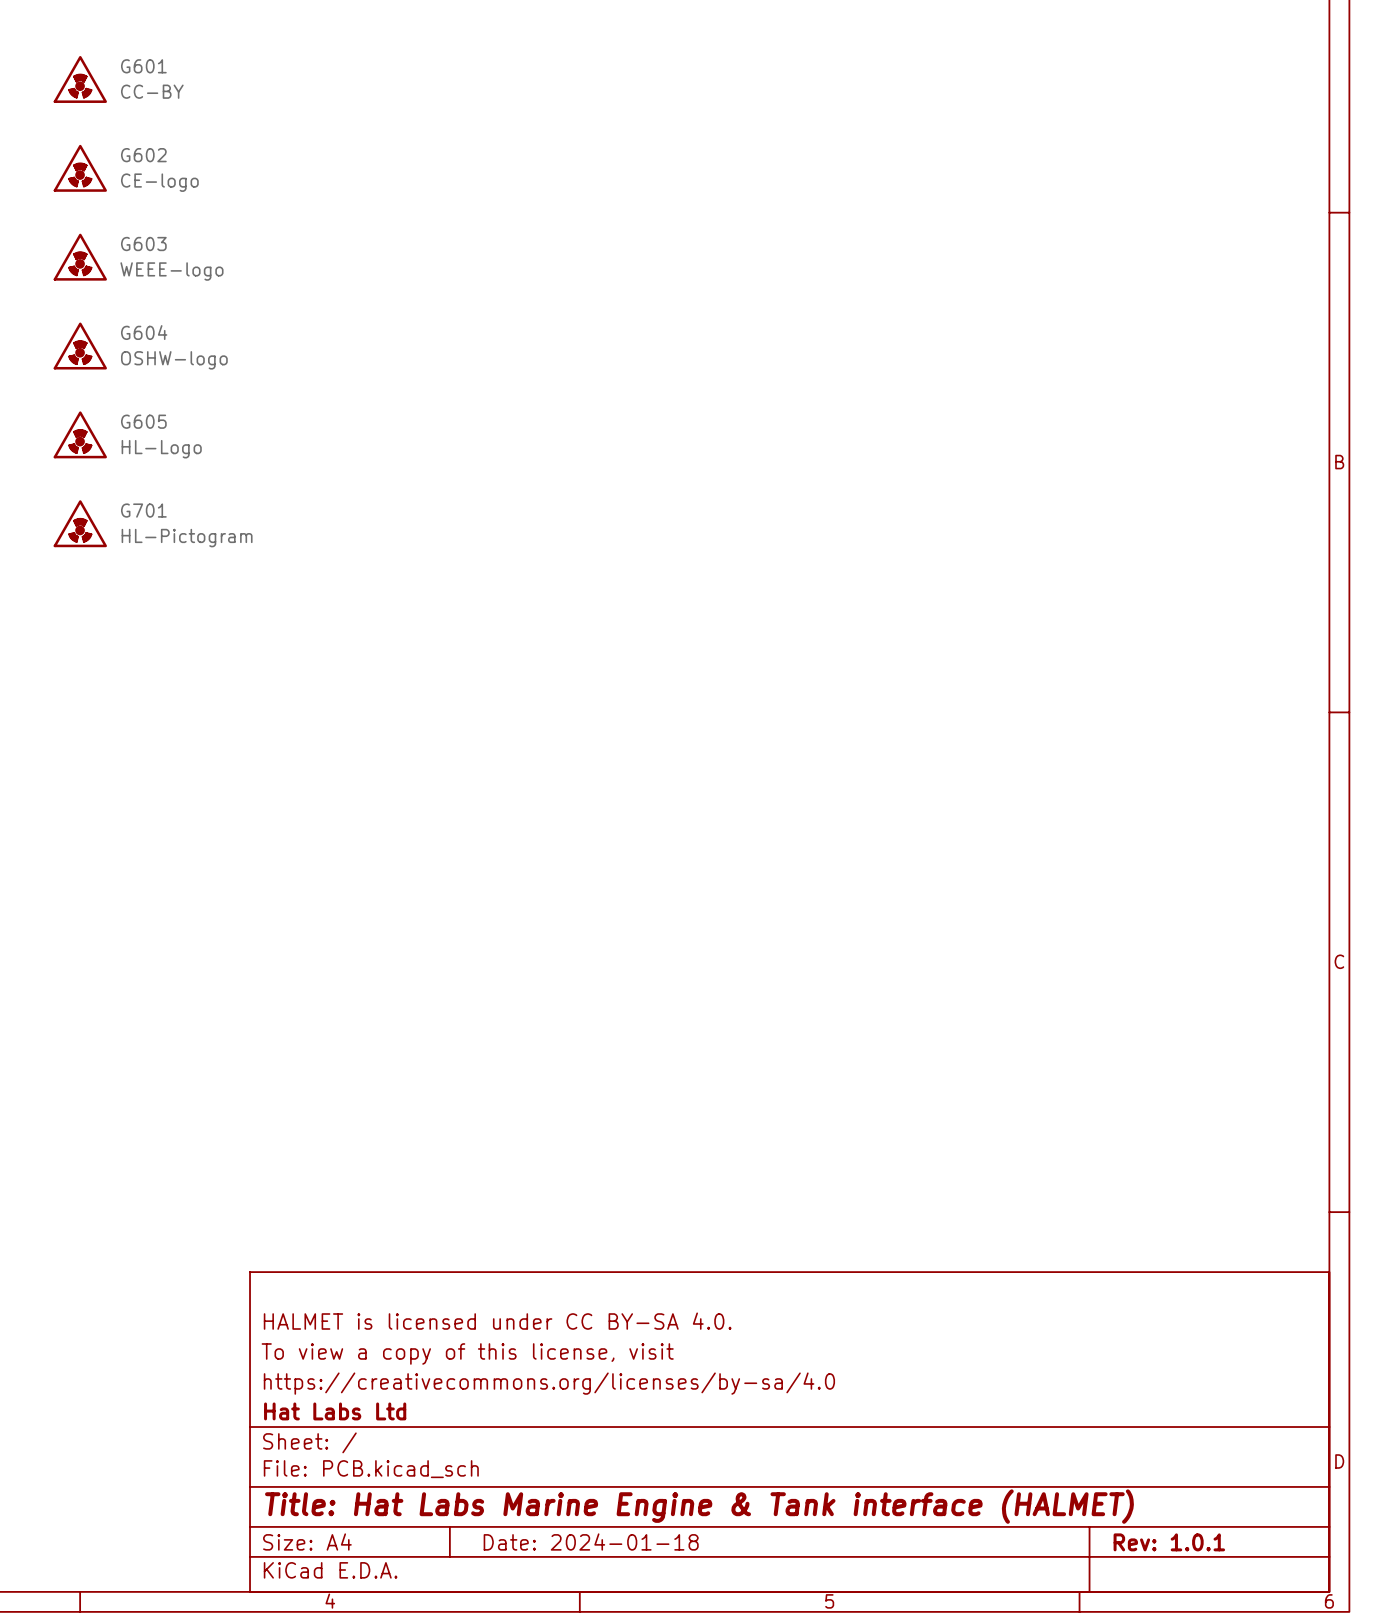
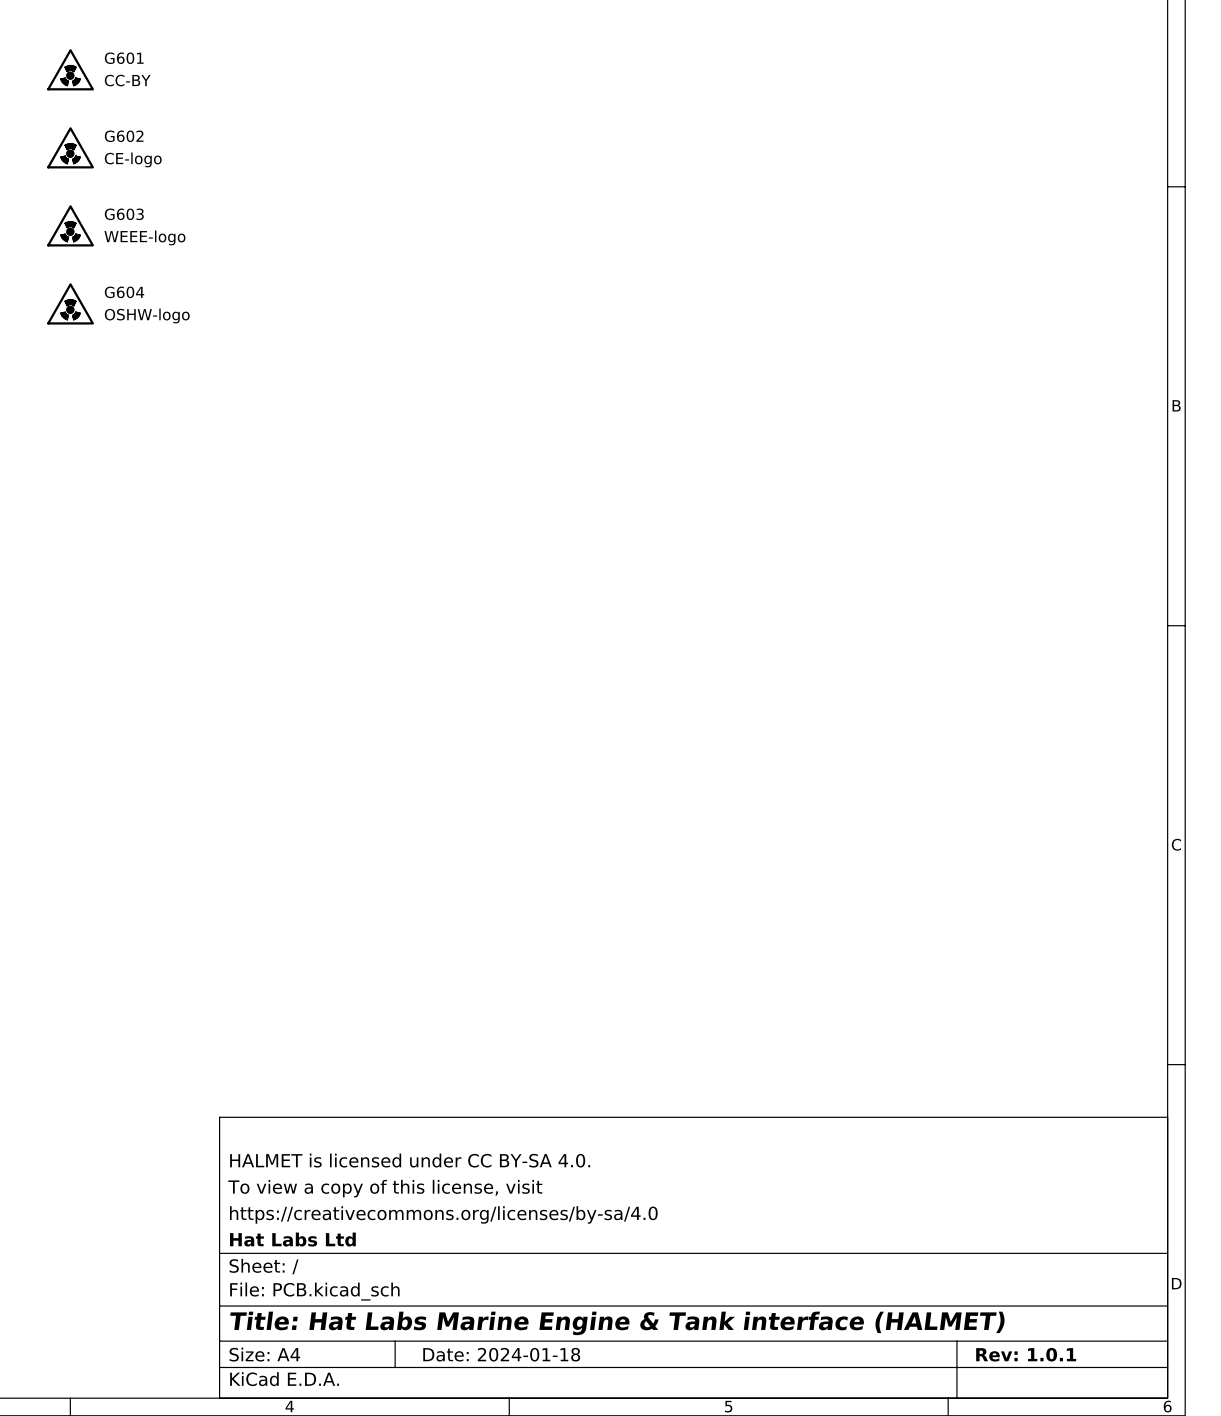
G605: HL-Logo (80, 434) -> none
G701: HL-Pictogram (80, 523) -> none

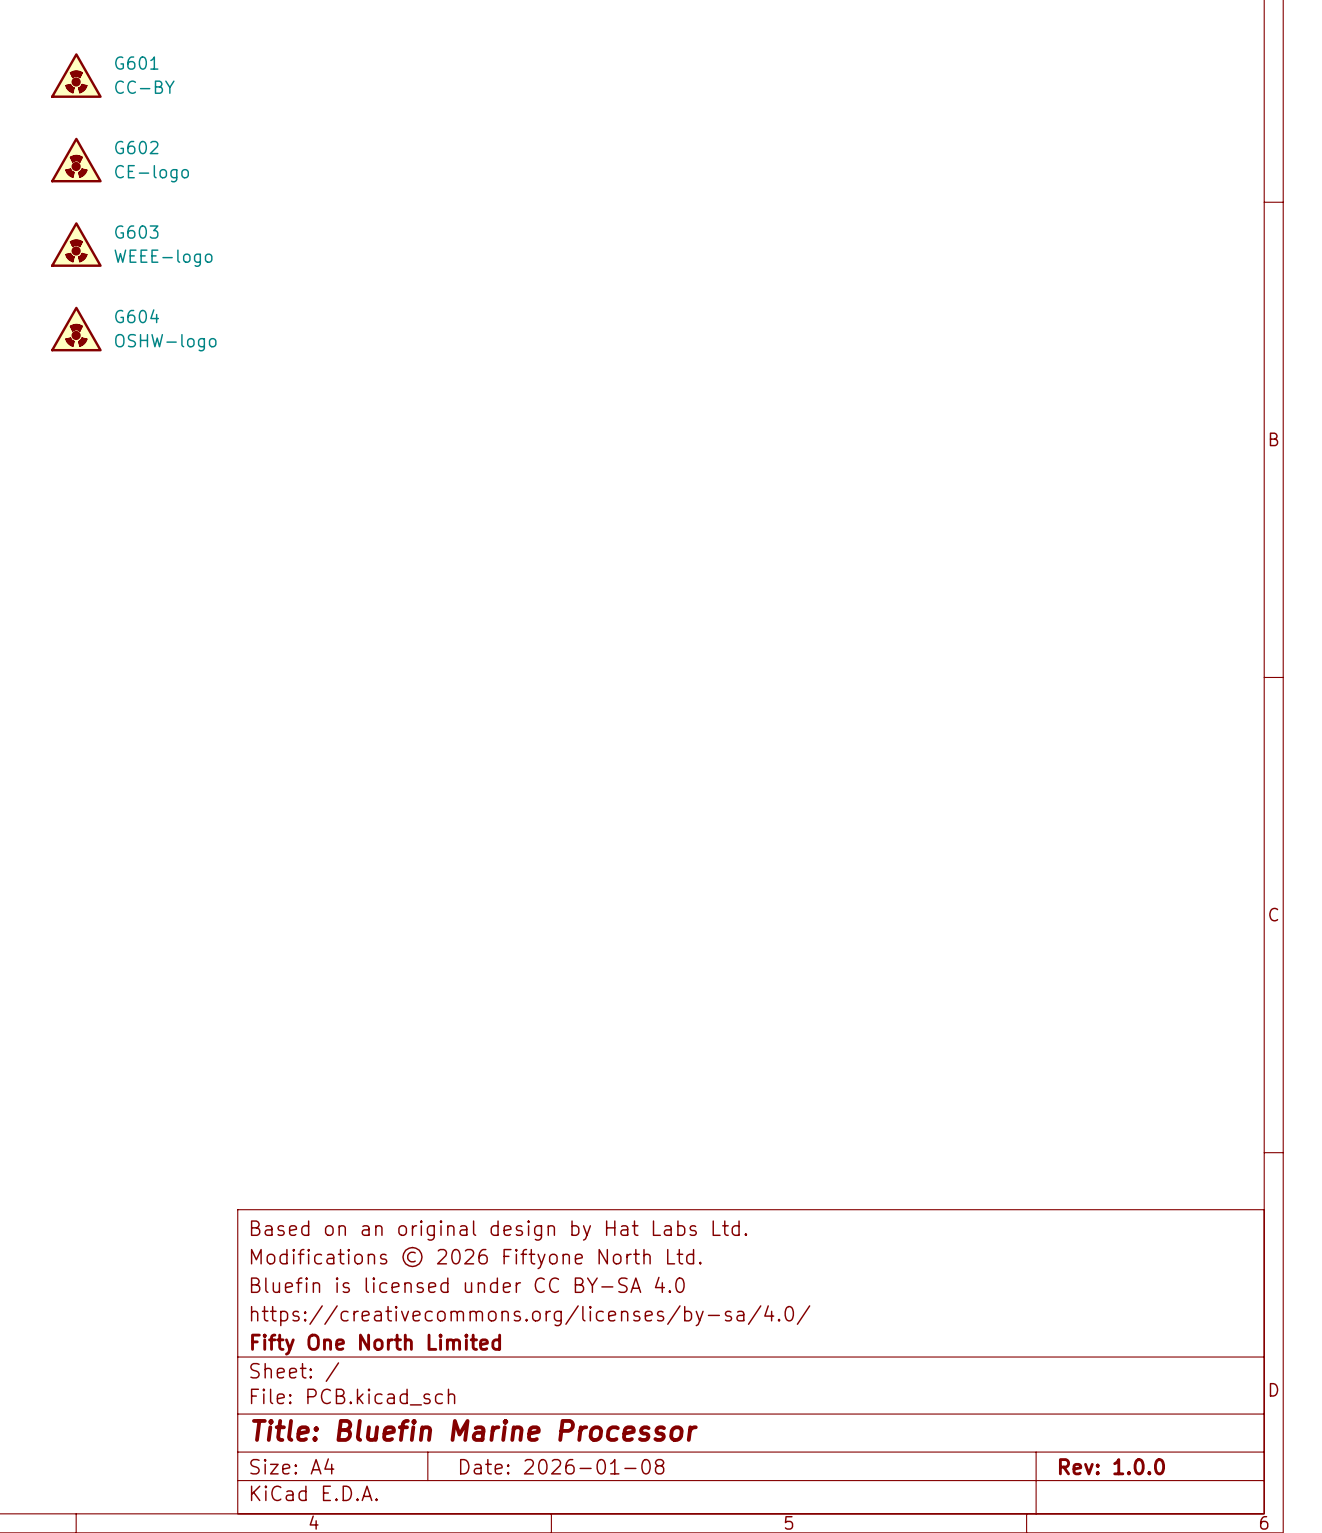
title block: none -> Based on an original design by Hat Labs Ltd. (499, 1230)
title block: HALMET is licensed under CC BY-SA 4.0. (410, 1160) -> Modifications © 2026 Fiftyone North Ltd. (476, 1258)
title block: To view a copy of this license, visit (385, 1188) -> Bluefin is licensed under CC BY-SA 4.0 (467, 1284)
title block: https://creativecommons.org/licenses/by-sa/4.0 (443, 1214) -> https://creativecommons.org/licenses/by-sa/4.0/ (530, 1315)
title block: Hat Labs Ltd (292, 1239) -> Fifty One North Limited (376, 1344)
title block: Title: Hat Labs Marine Engine & Tank interface (HALMET) (617, 1323) -> Title: Bluefin Marine Processor (474, 1430)
title block: Date: 2024-01-18 (501, 1354) -> Date: 2026-01-08 (562, 1466)
title block: Rev: 1.0.1 (1026, 1354) -> Rev: 1.0.0 (1111, 1466)

